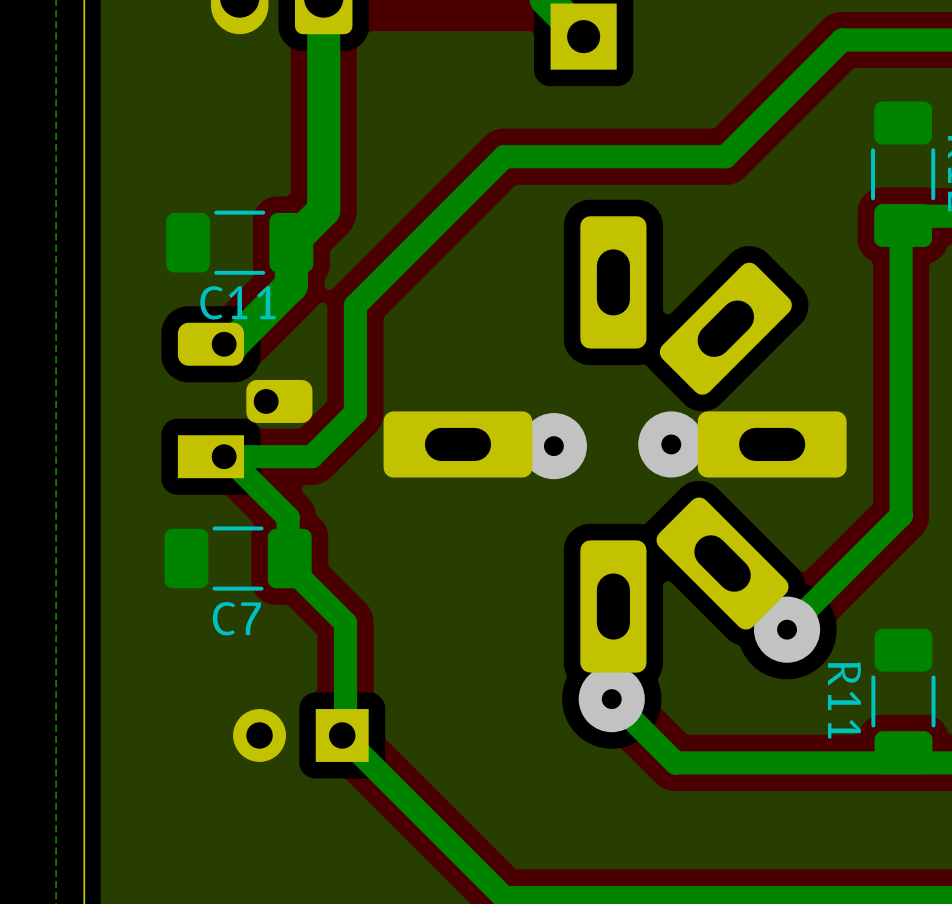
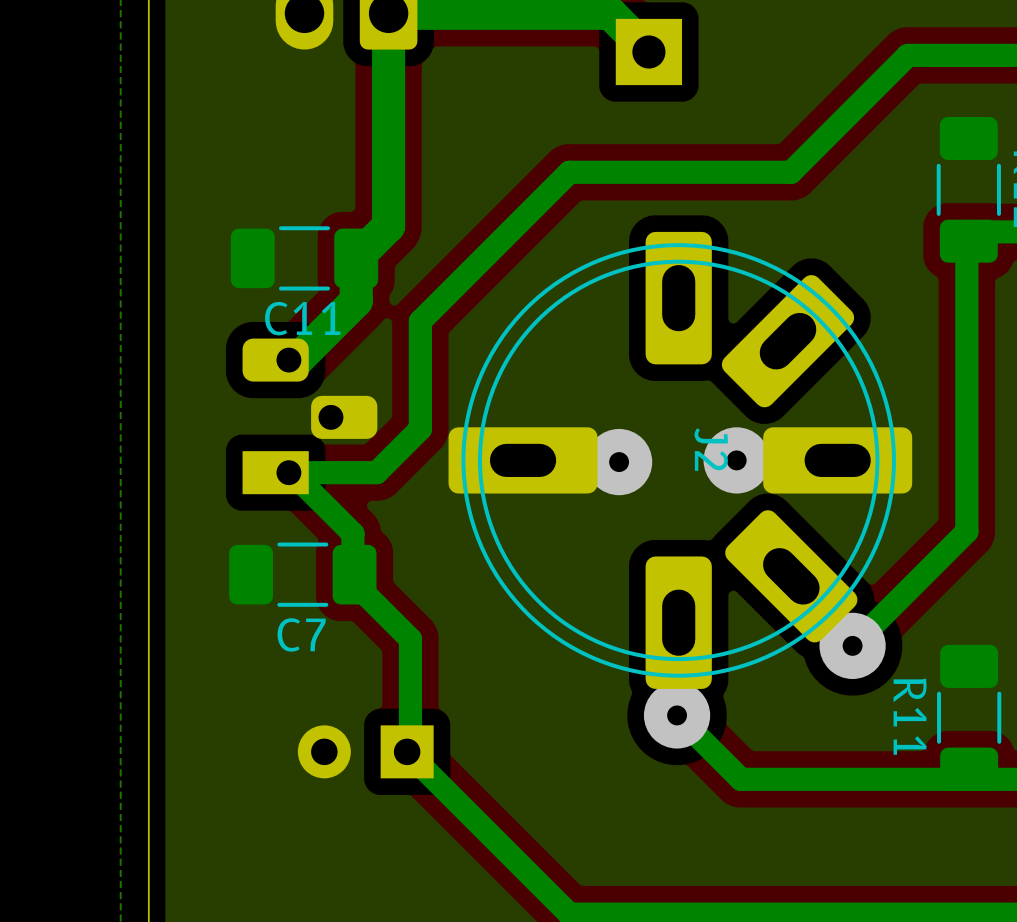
J2 side: top (615, 444) -> bottom (680, 460)

